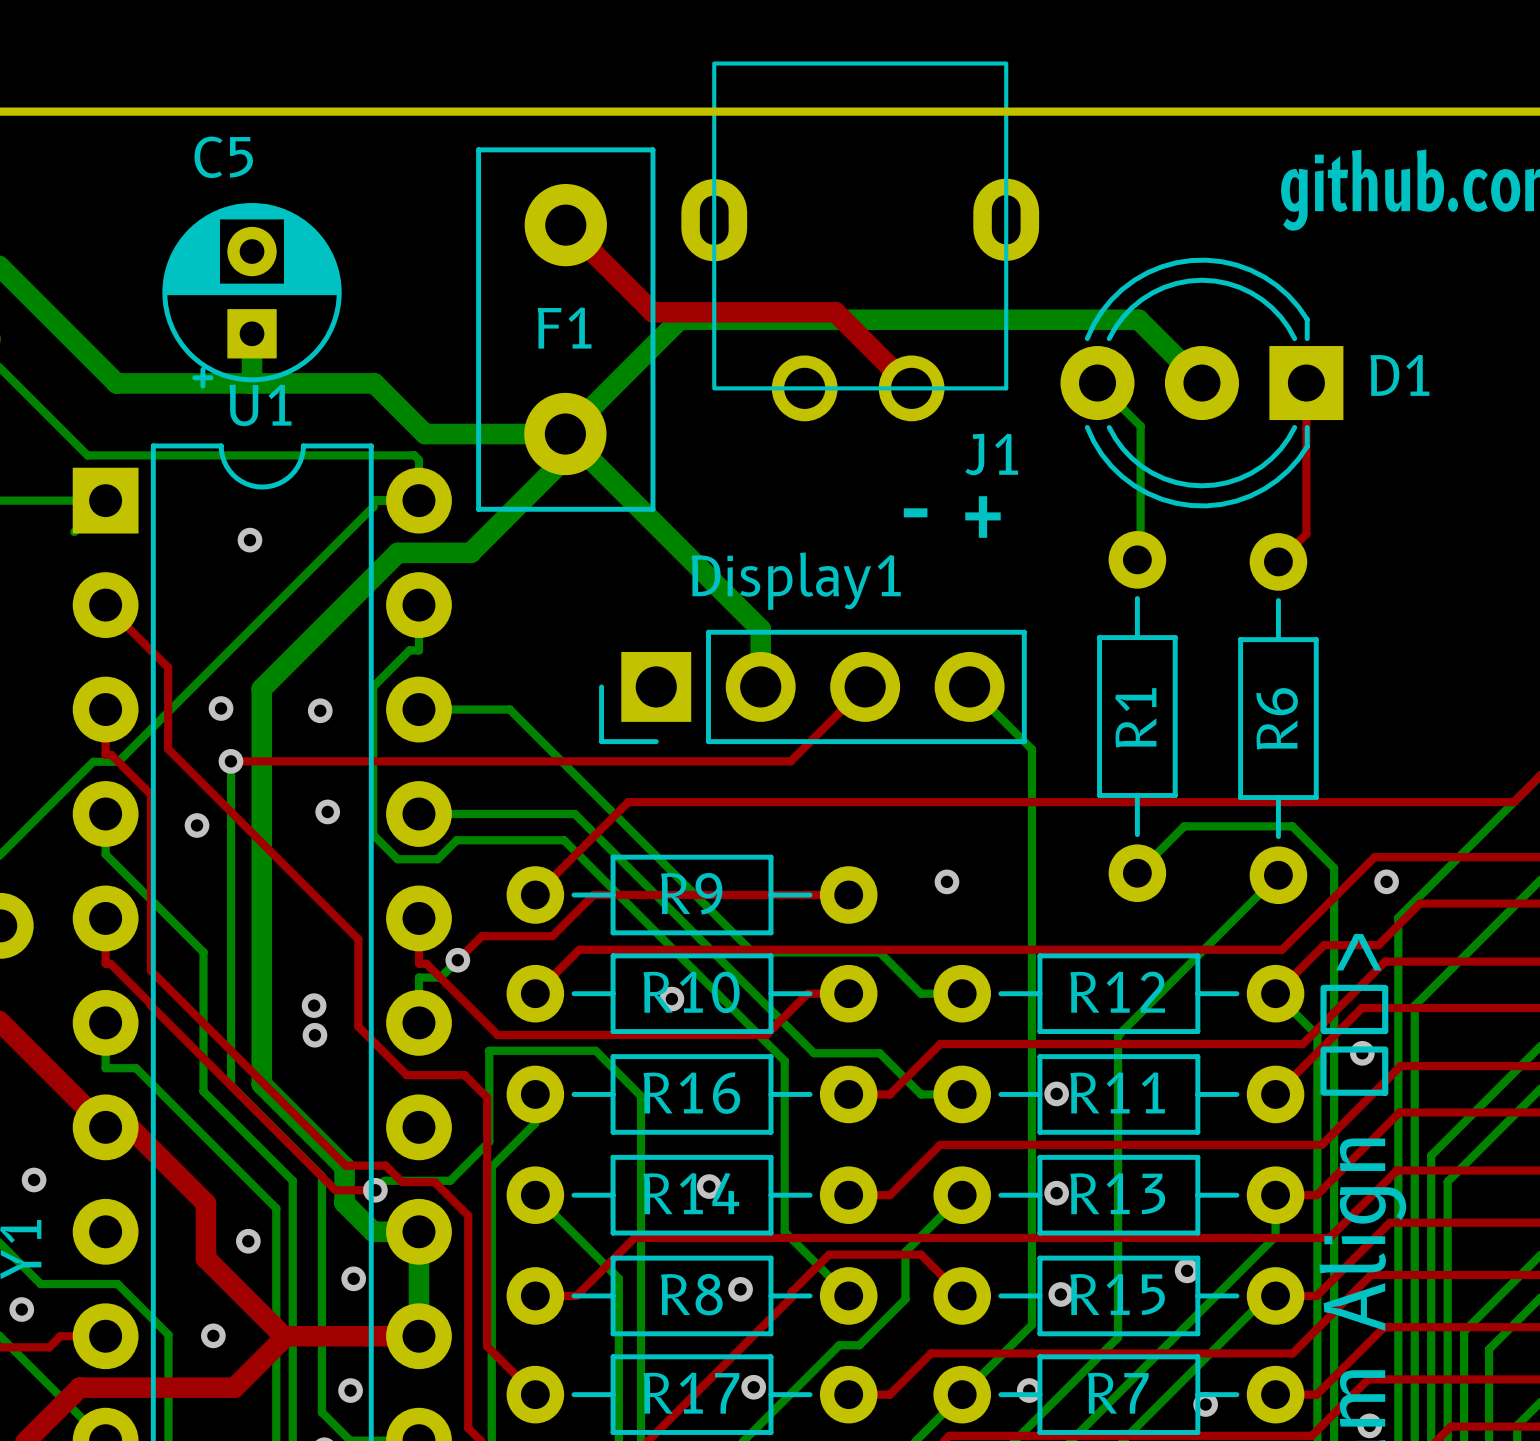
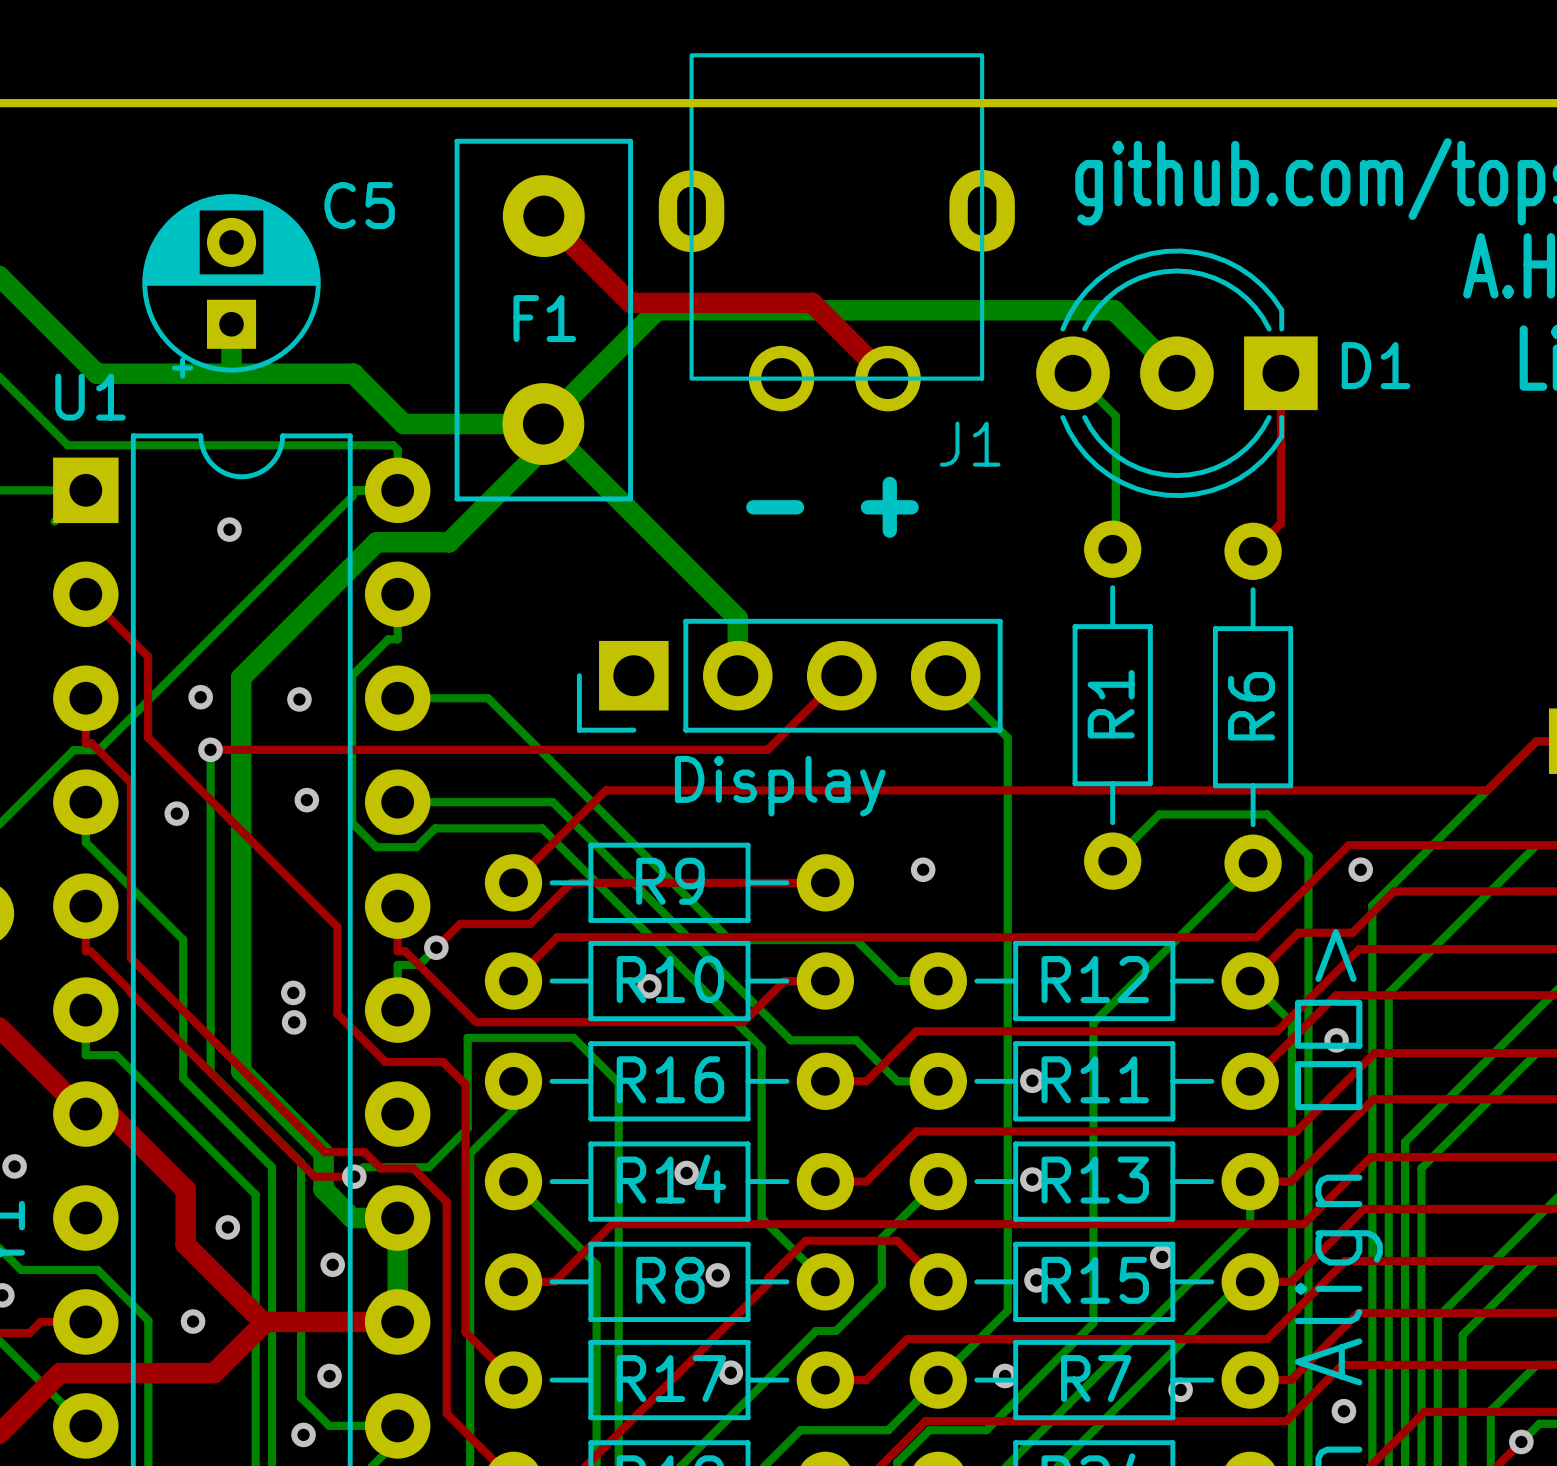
C5 name position: C5 (223, 157) -> C5 (359, 205)
U1 name position: U1 (260, 405) -> U1 (90, 397)
text position: + - (952, 517) -> + - (832, 507)
Display1 name: Display1 (796, 581) -> Display (780, 786)

